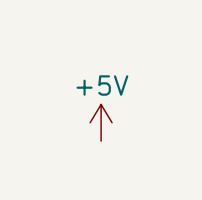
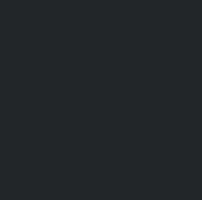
power symbol: +5V (101, 122) -> none

